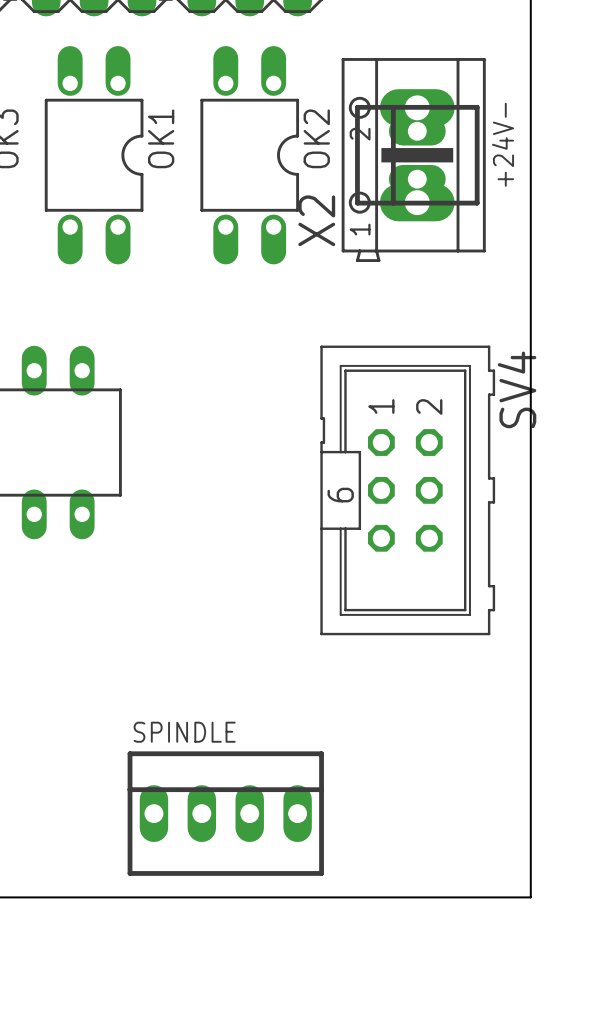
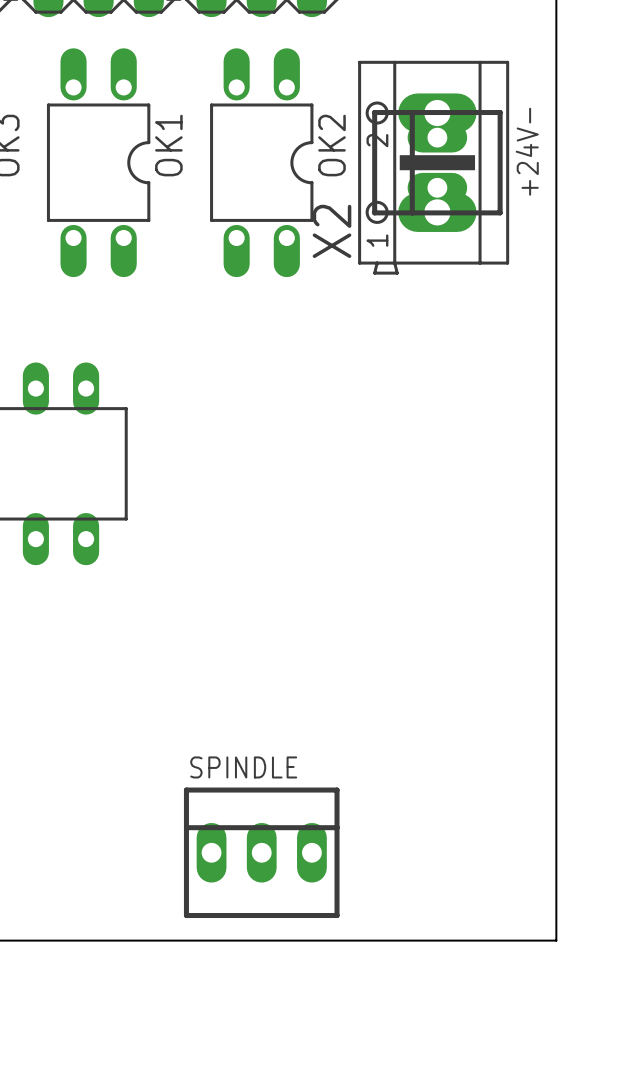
SV4: (407, 490) -> none
SPINDLE: (225, 813) -> none
SPINDLE: none -> (261, 852)

